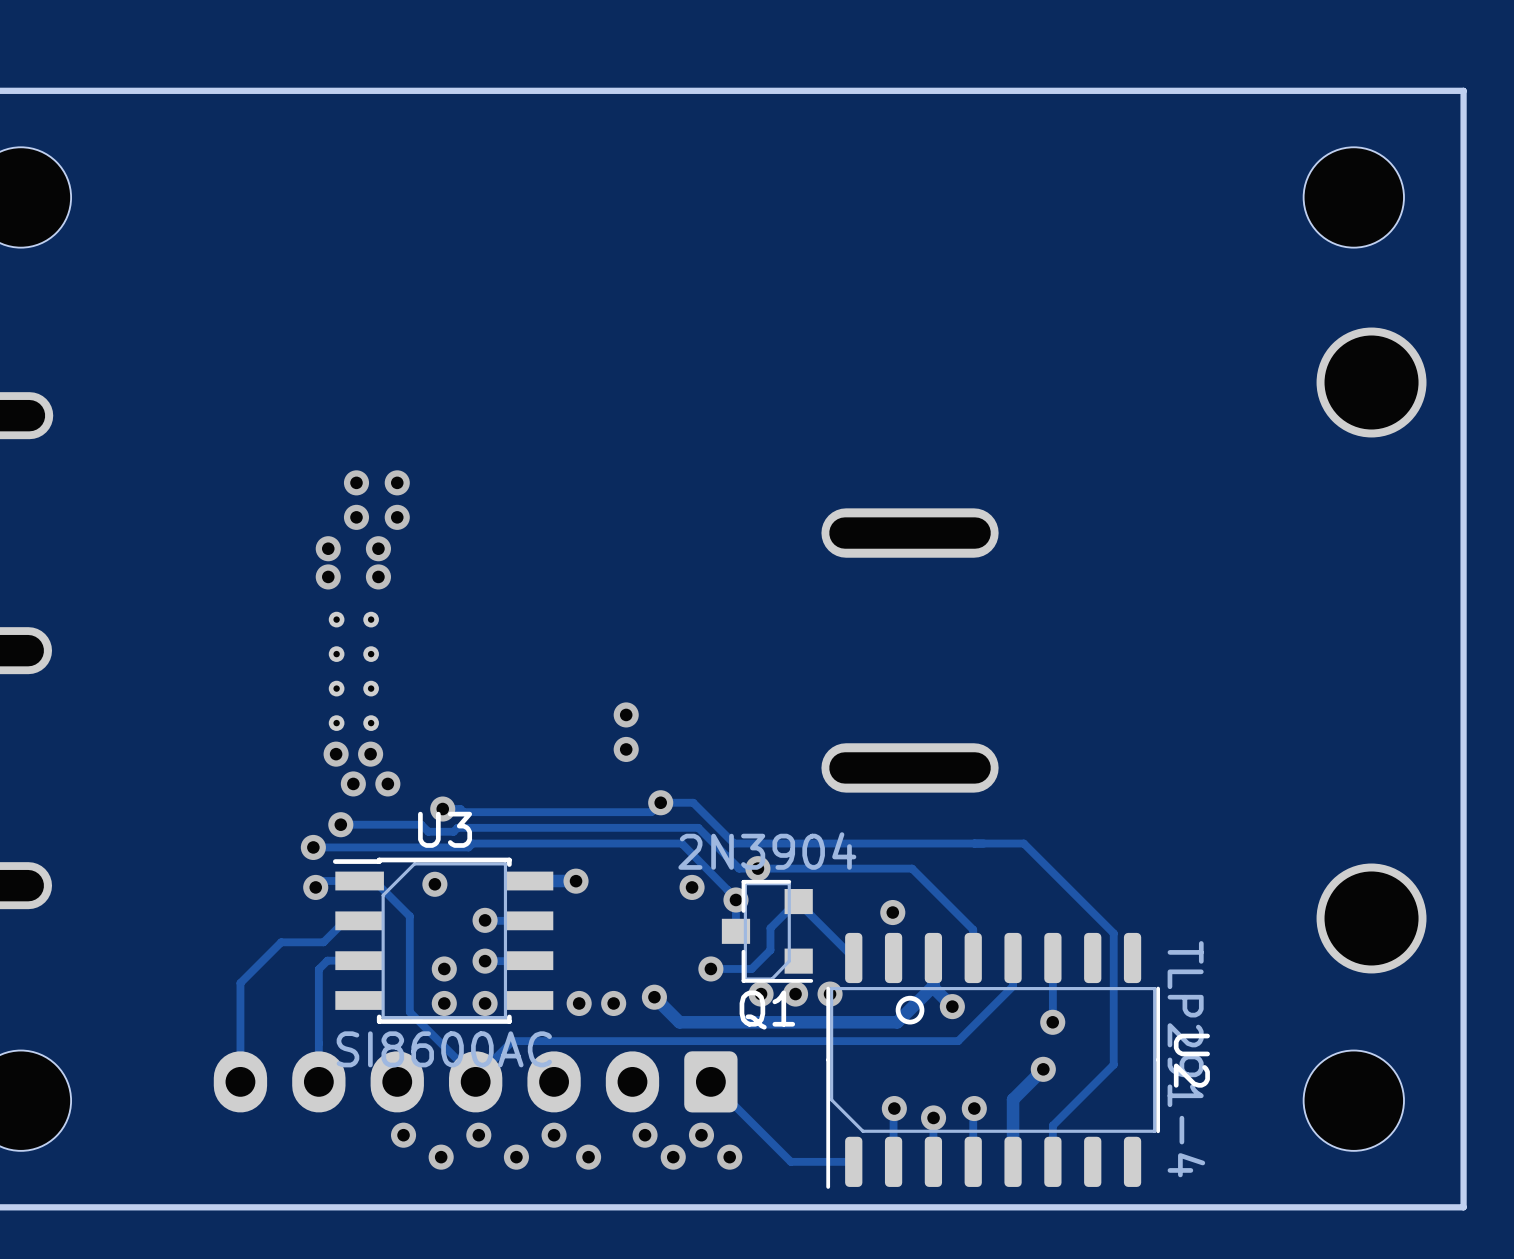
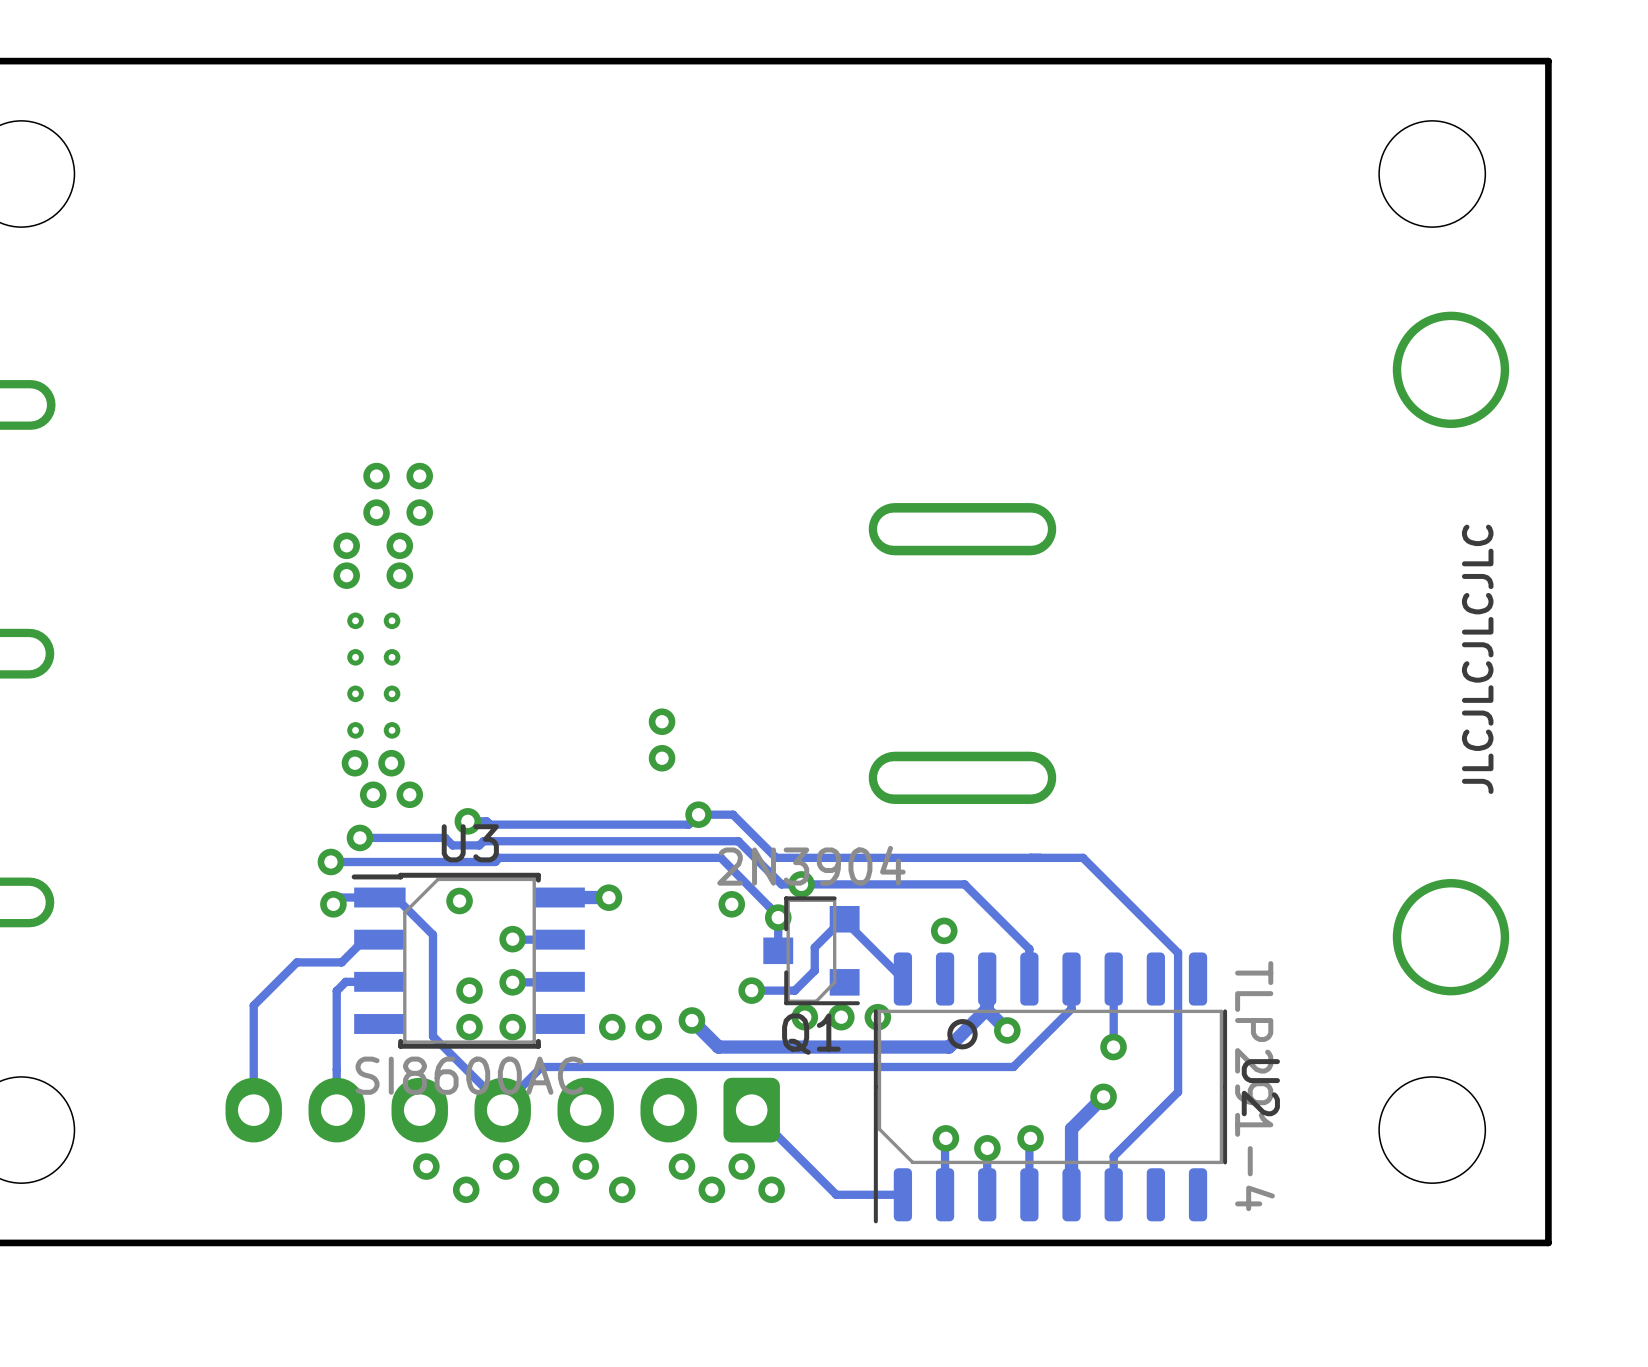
text: none -> JLCJLCJLCJLC (1477, 659)

